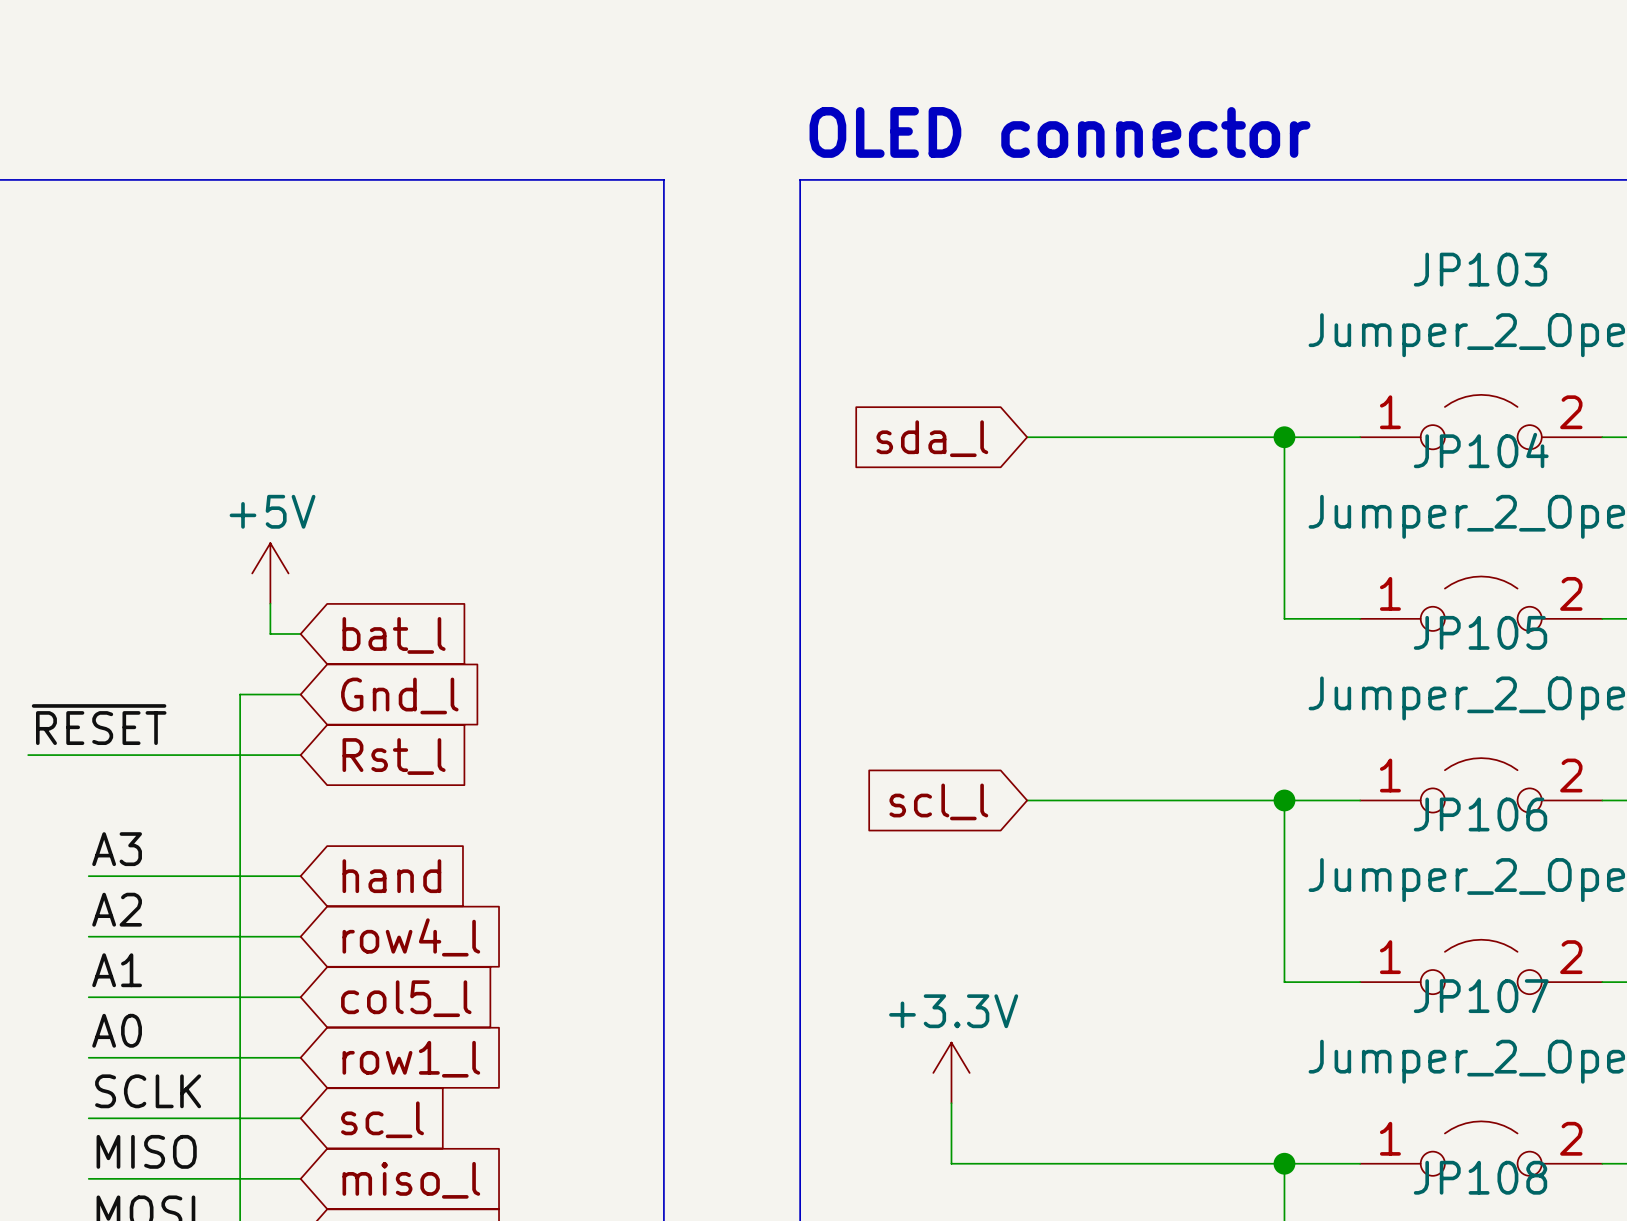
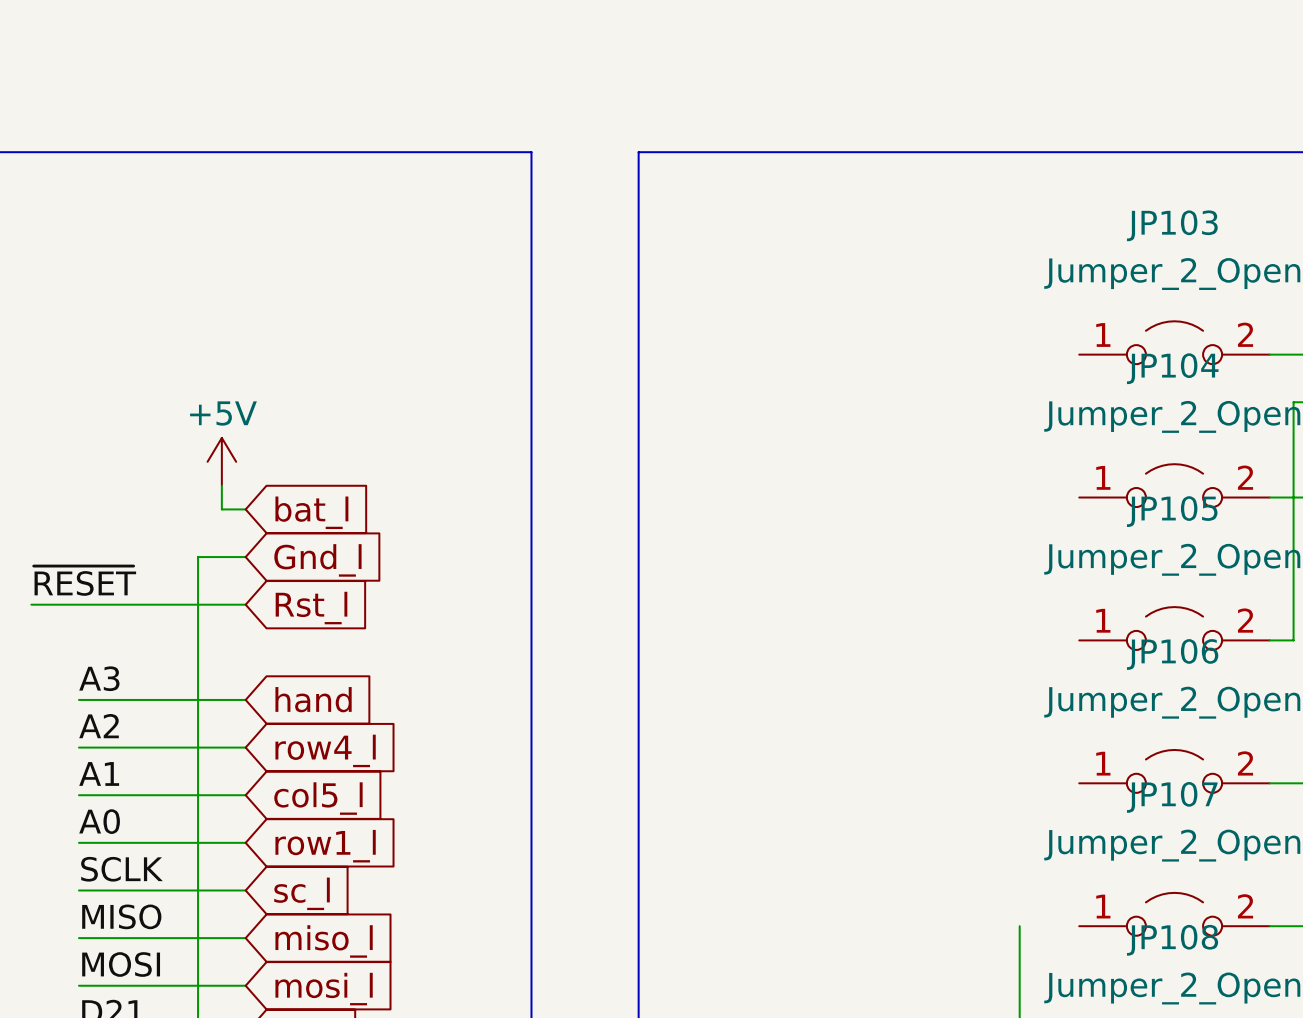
text: OLED connector (1059, 132) -> none
wire: (1027, 437) (1360, 437) -> none
wire: (1284, 437) (1284, 618) (1360, 618) -> none
junction: (1284, 437) -> none
global label: sda_l (932, 438) -> none
wire: (1027, 800) (1360, 800) -> none
wire: (1284, 800) (1284, 982) (1360, 982) -> none
junction: (1284, 800) -> none
global label: scl_l (938, 801) -> none
power symbol: +3.3V (951, 1072) -> none
wire: (951, 1103) (951, 1163) (1360, 1163) -> none
junction: (1284, 1163) -> none

